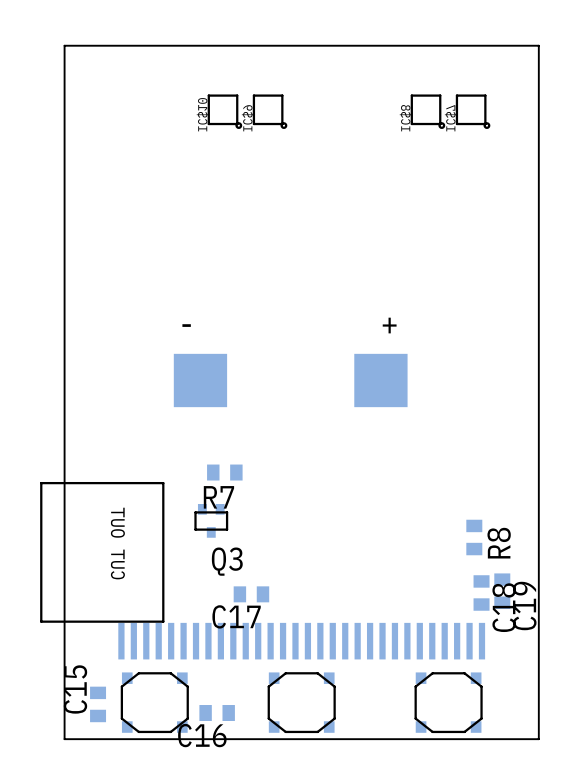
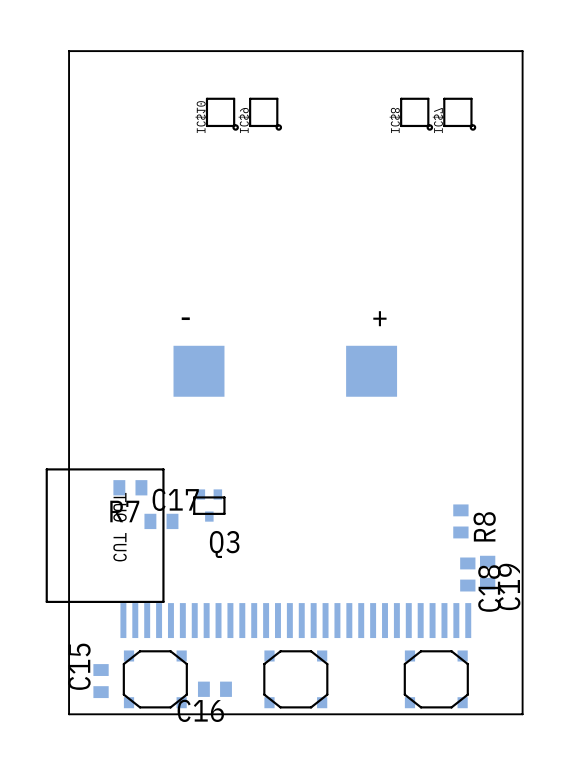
R7 position: (224, 472) -> (130, 487)
C17 position: (251, 594) -> (161, 521)
C17 name position: C17 (236, 616) -> C17 (175, 499)

